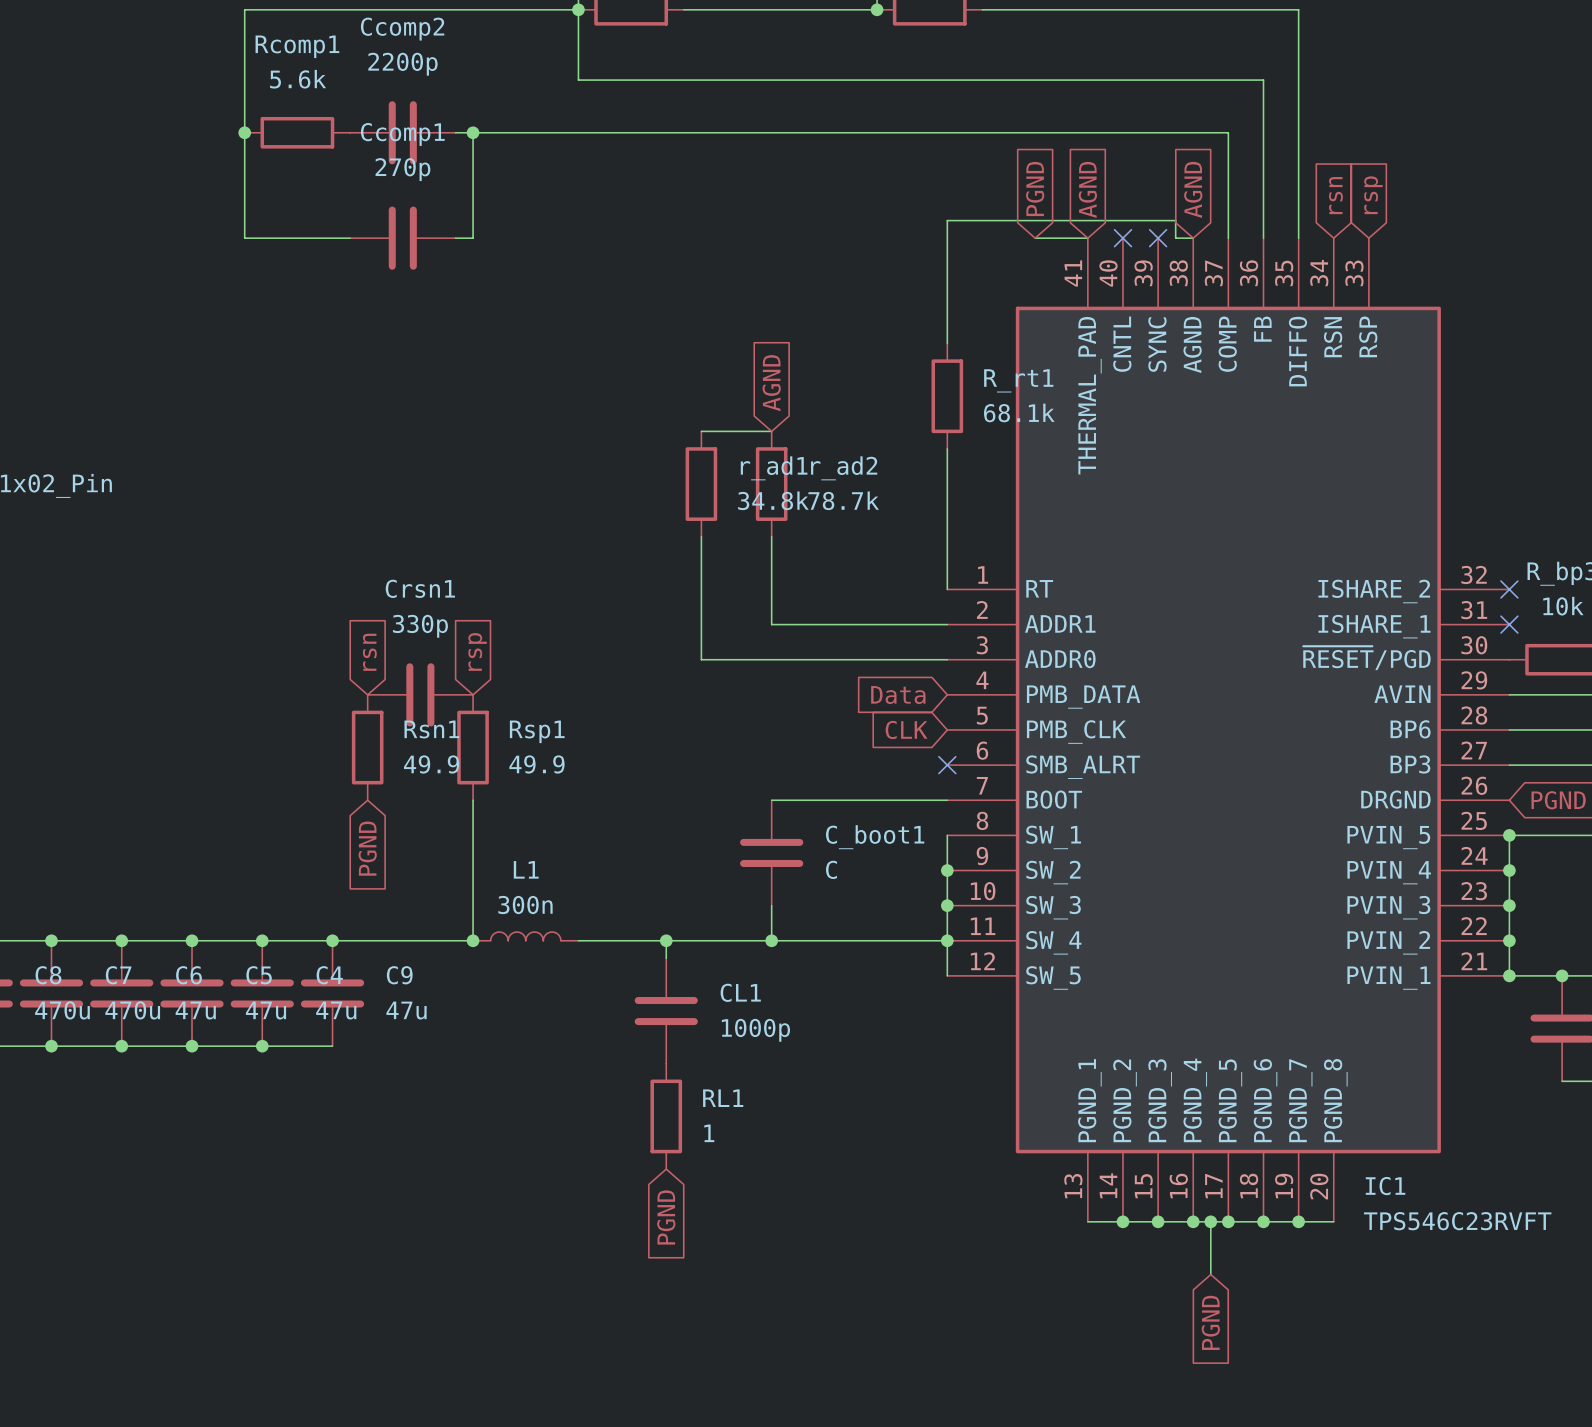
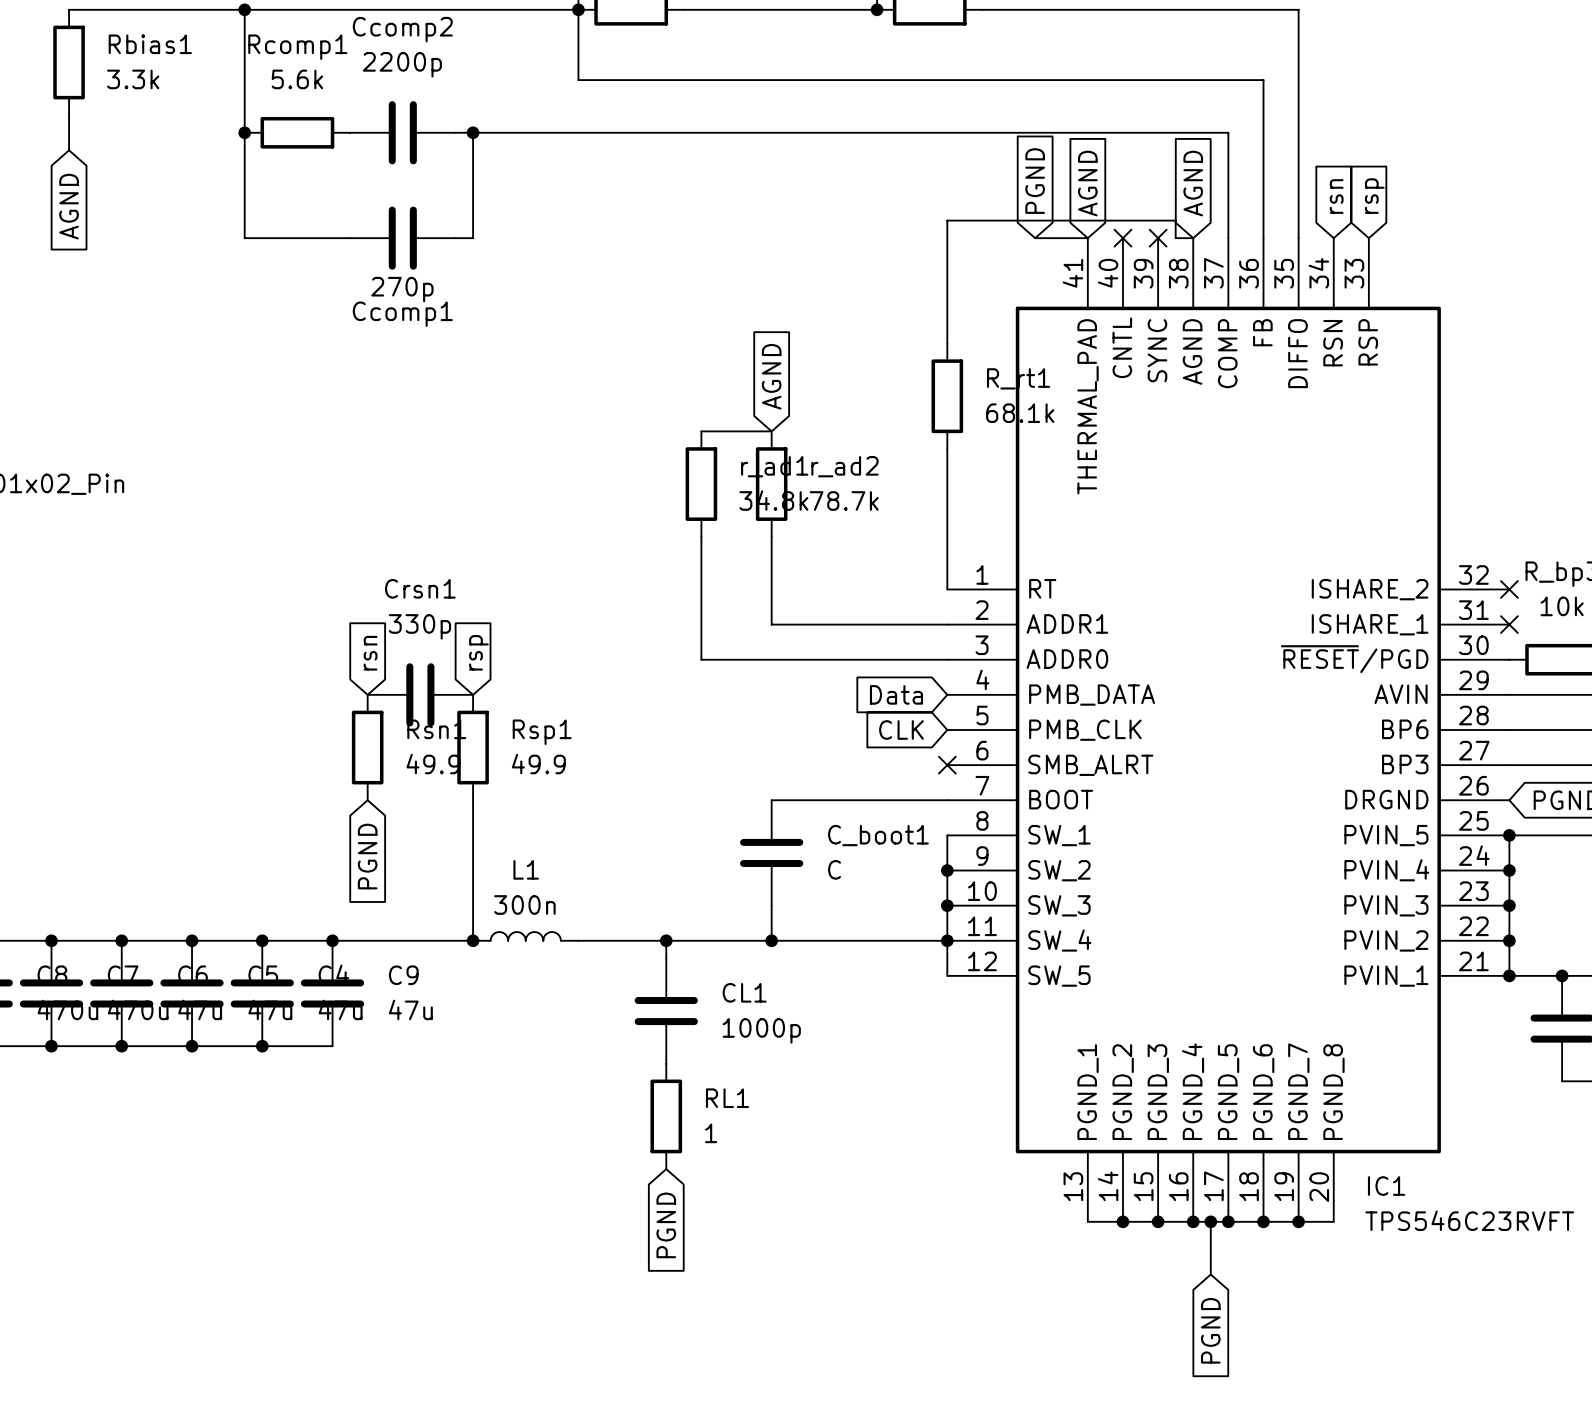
wire: none -> (69, 9) (244, 9)
junction: none -> (244, 9)
Rbias1: none -> 3.3k (69, 62)
wire: none -> (69, 115) (69, 150)
Ccomp1 name position: Ccomp1 (402, 134) -> Ccomp1 (402, 314)
Ccomp1 value position: 270p (402, 169) -> 270p (402, 289)
global label: none -> AGND (69, 206)

